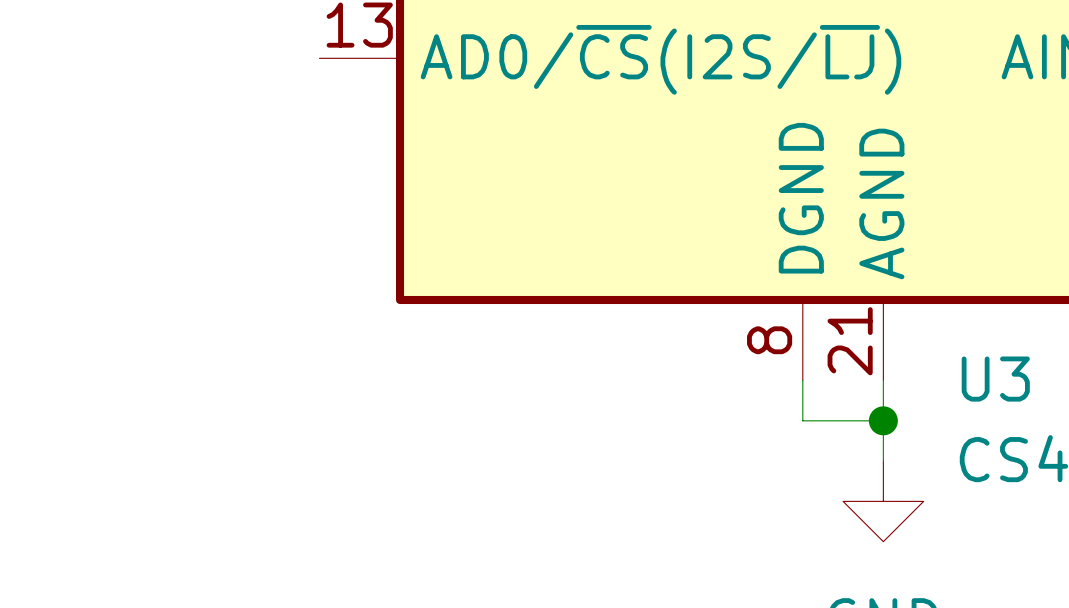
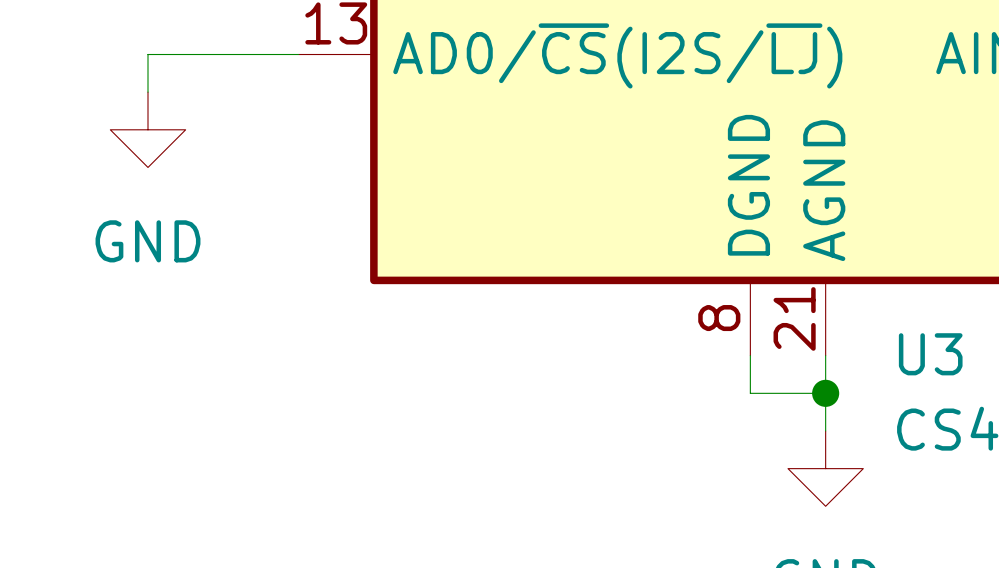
wire: none -> (298, 54) (147, 54) (147, 92)
power symbol: none -> GND (147, 129)

